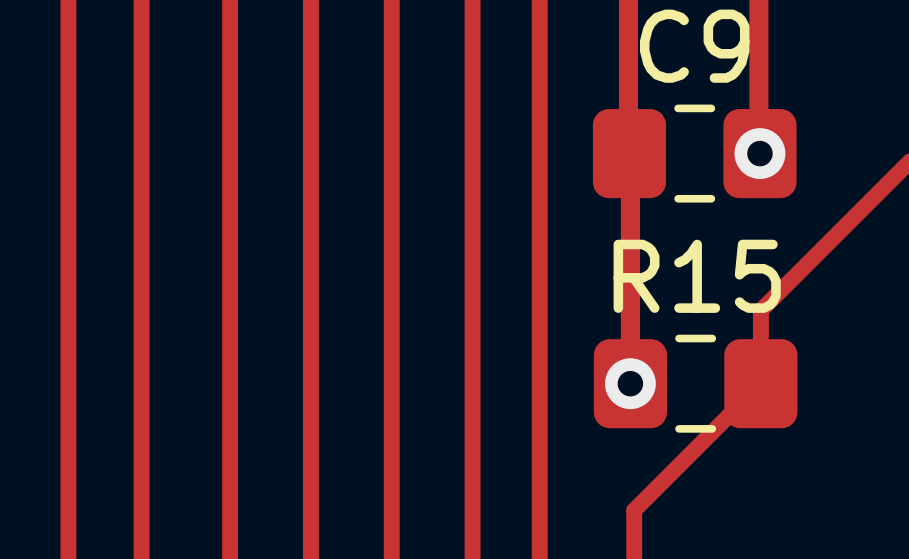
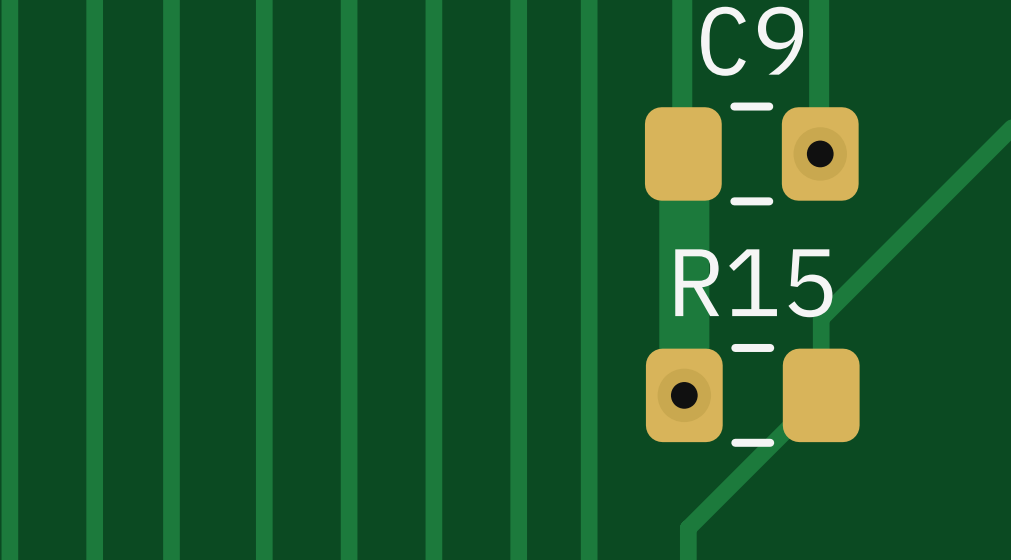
track width: thin (629, 153) (630, 383) -> thick (683, 153) (684, 395)

